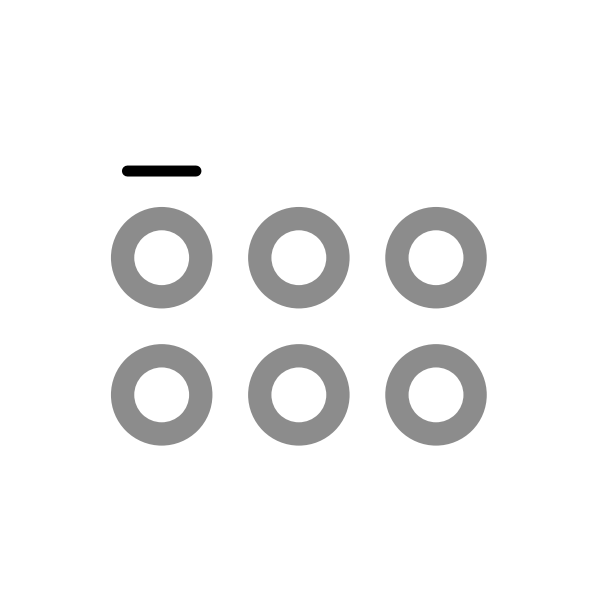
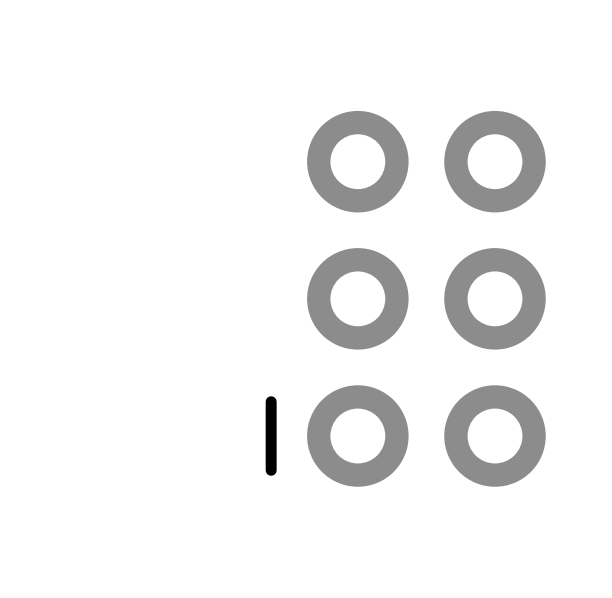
part rotation: 0° (298, 305) -> 90° counterclockwise (405, 298)

